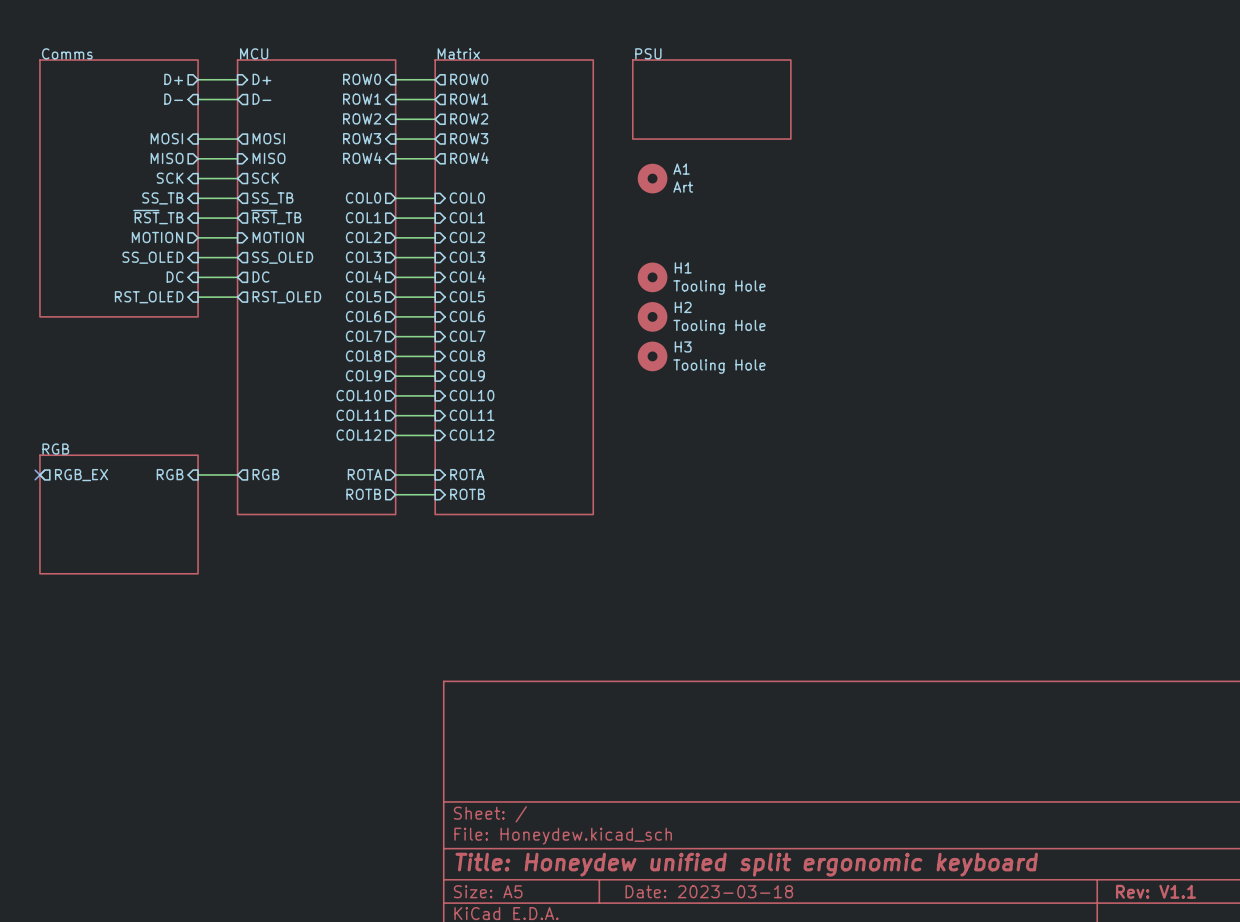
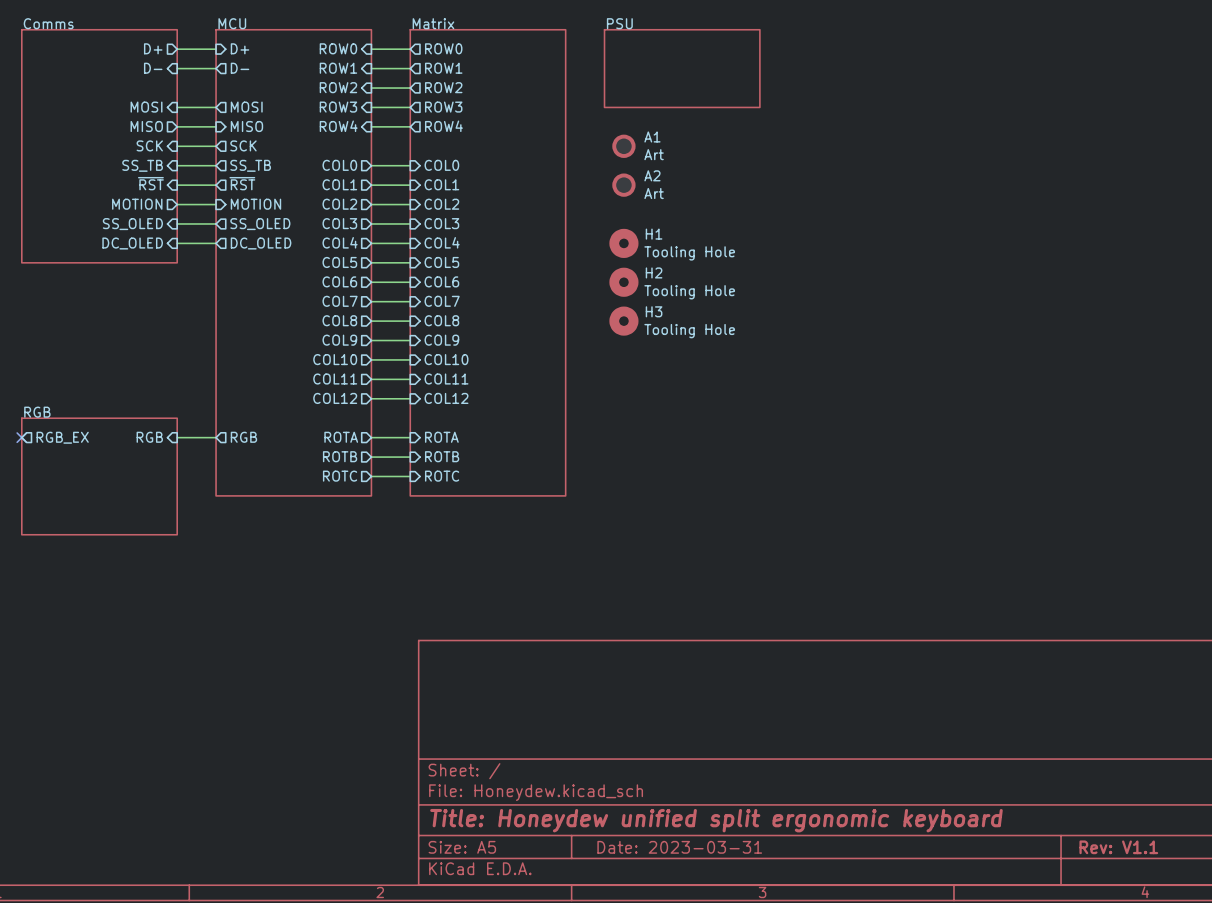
A1 symbol: [637, 163, 668, 194] -> [612, 134, 636, 158]
sheet Comms: none -> (99, 146)
sheet Comms: (119, 188) -> none
sheet pin: ~{RST}_TB (158, 217) -> ~{RST} (150, 183)
sheet pin: ~{RST}_TB (276, 217) -> ~{RST} (242, 183)
A2: none -> Art (623, 185)
sheet pin: DC (175, 277) -> DC_OLED (132, 243)
sheet pin: DC (261, 277) -> DC_OLED (261, 243)
sheet MCU: (316, 287) -> none
sheet Matrix: (514, 287) -> none
sheet pin: RST_OLED (149, 297) -> none
wire: (198, 297) (237, 297) -> none
sheet pin: RST_OLED (286, 297) -> none
sheet MCU: none -> (293, 262)
sheet Matrix: none -> (487, 262)
sheet pin: none -> ROTC (340, 476)
wire: none -> (371, 476) (410, 476)
sheet pin: none -> ROTC (442, 476)
title block: Date: 2023-03-18 (709, 891) -> Date: 2023-03-31 (679, 847)

